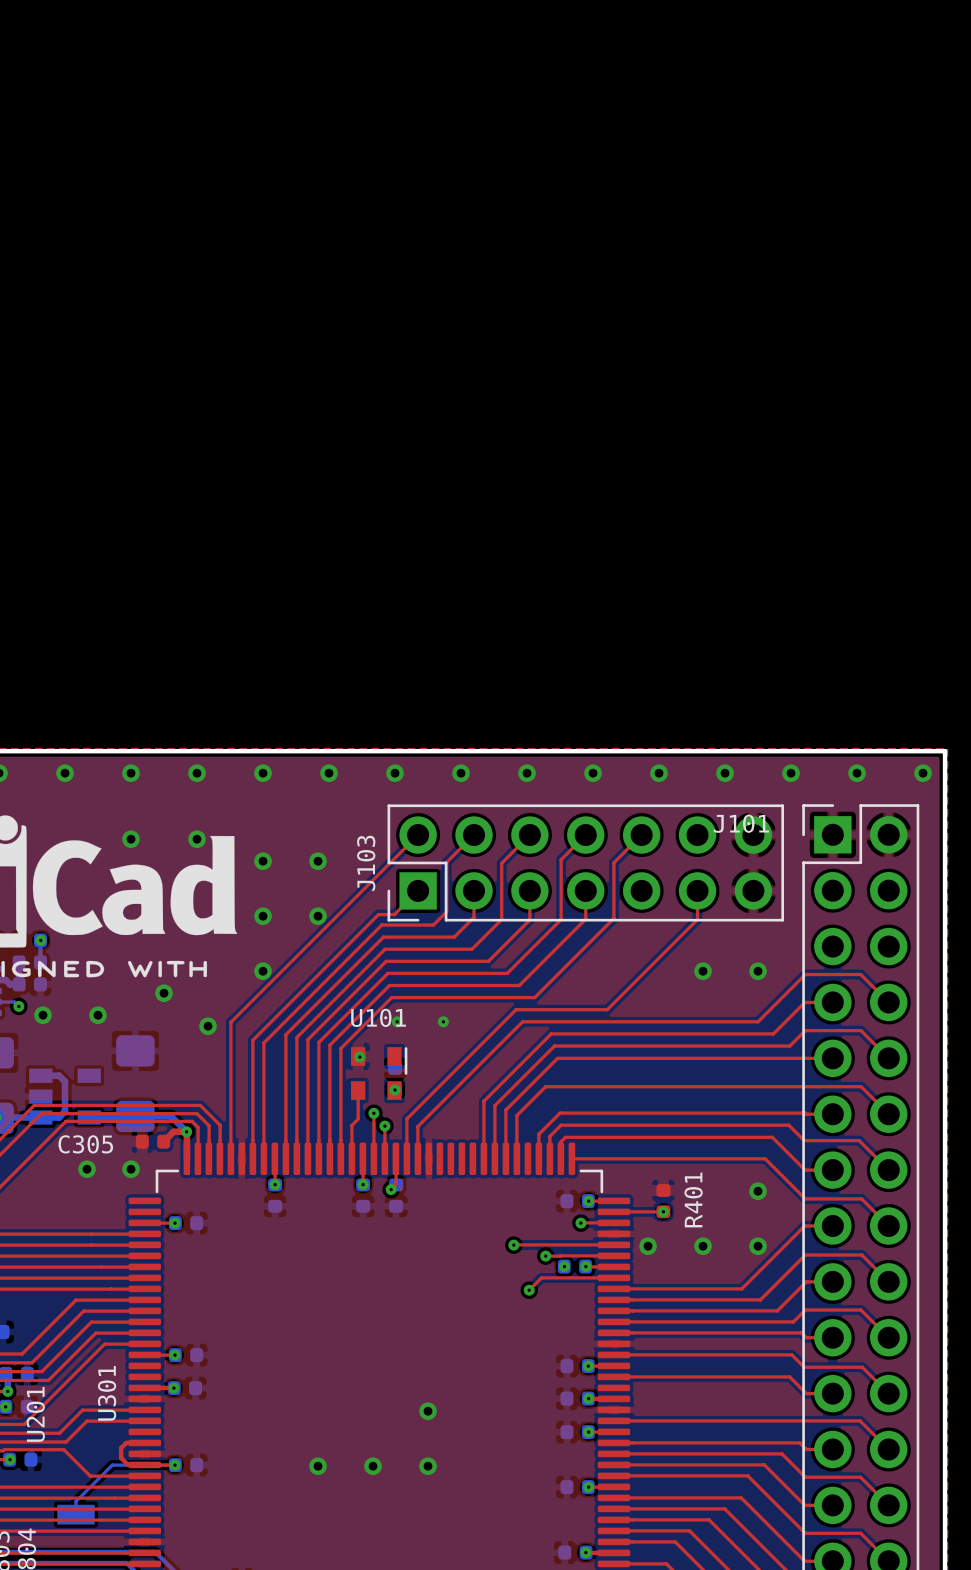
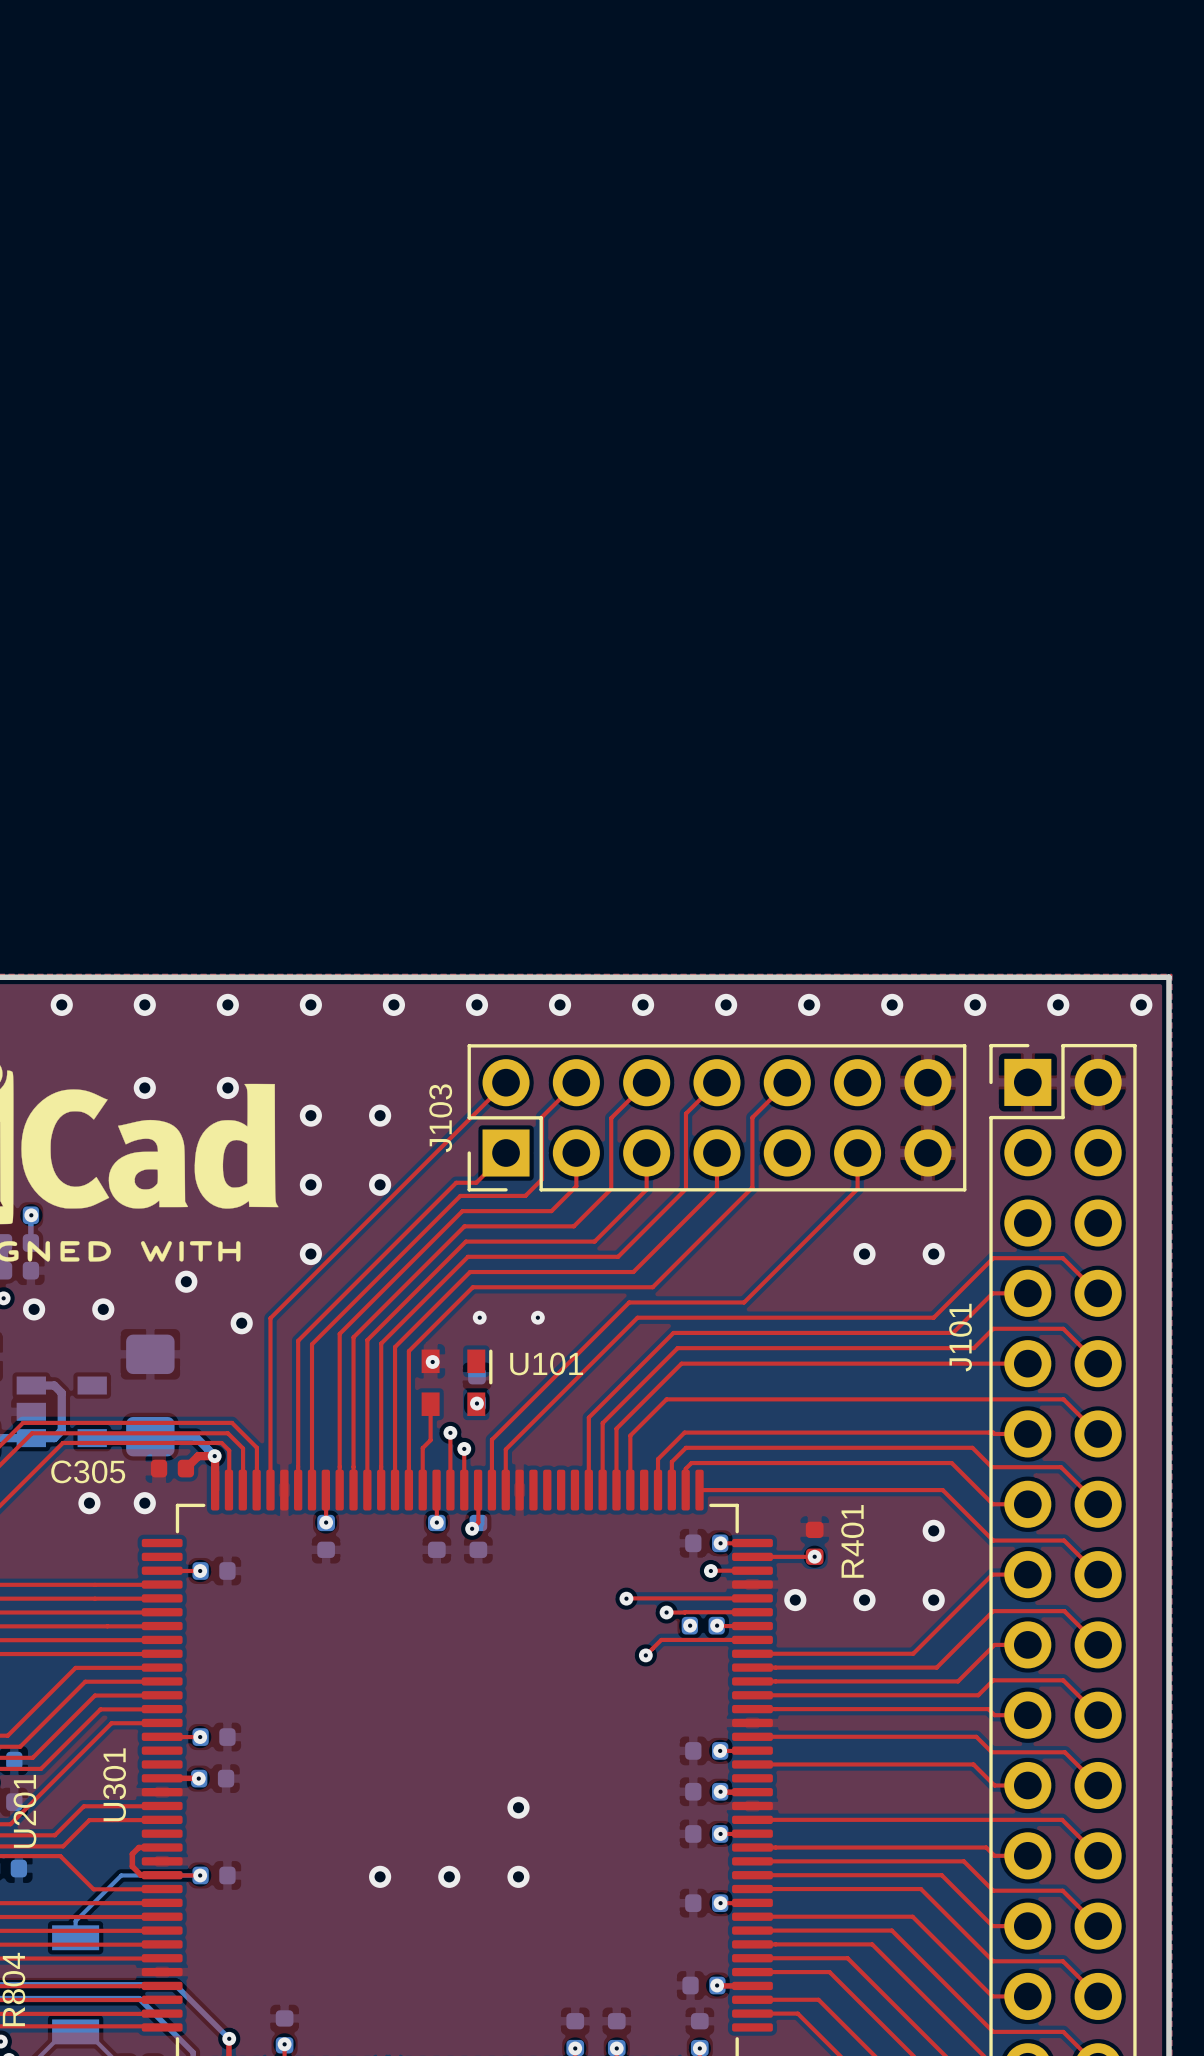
J101 name rotation: 0° (741, 823) -> 90° counterclockwise (960, 1337)
J101 name position: J101 (741, 823) -> J101 (960, 1337)
U101 name position: U101 (378, 1017) -> U101 (546, 1363)

